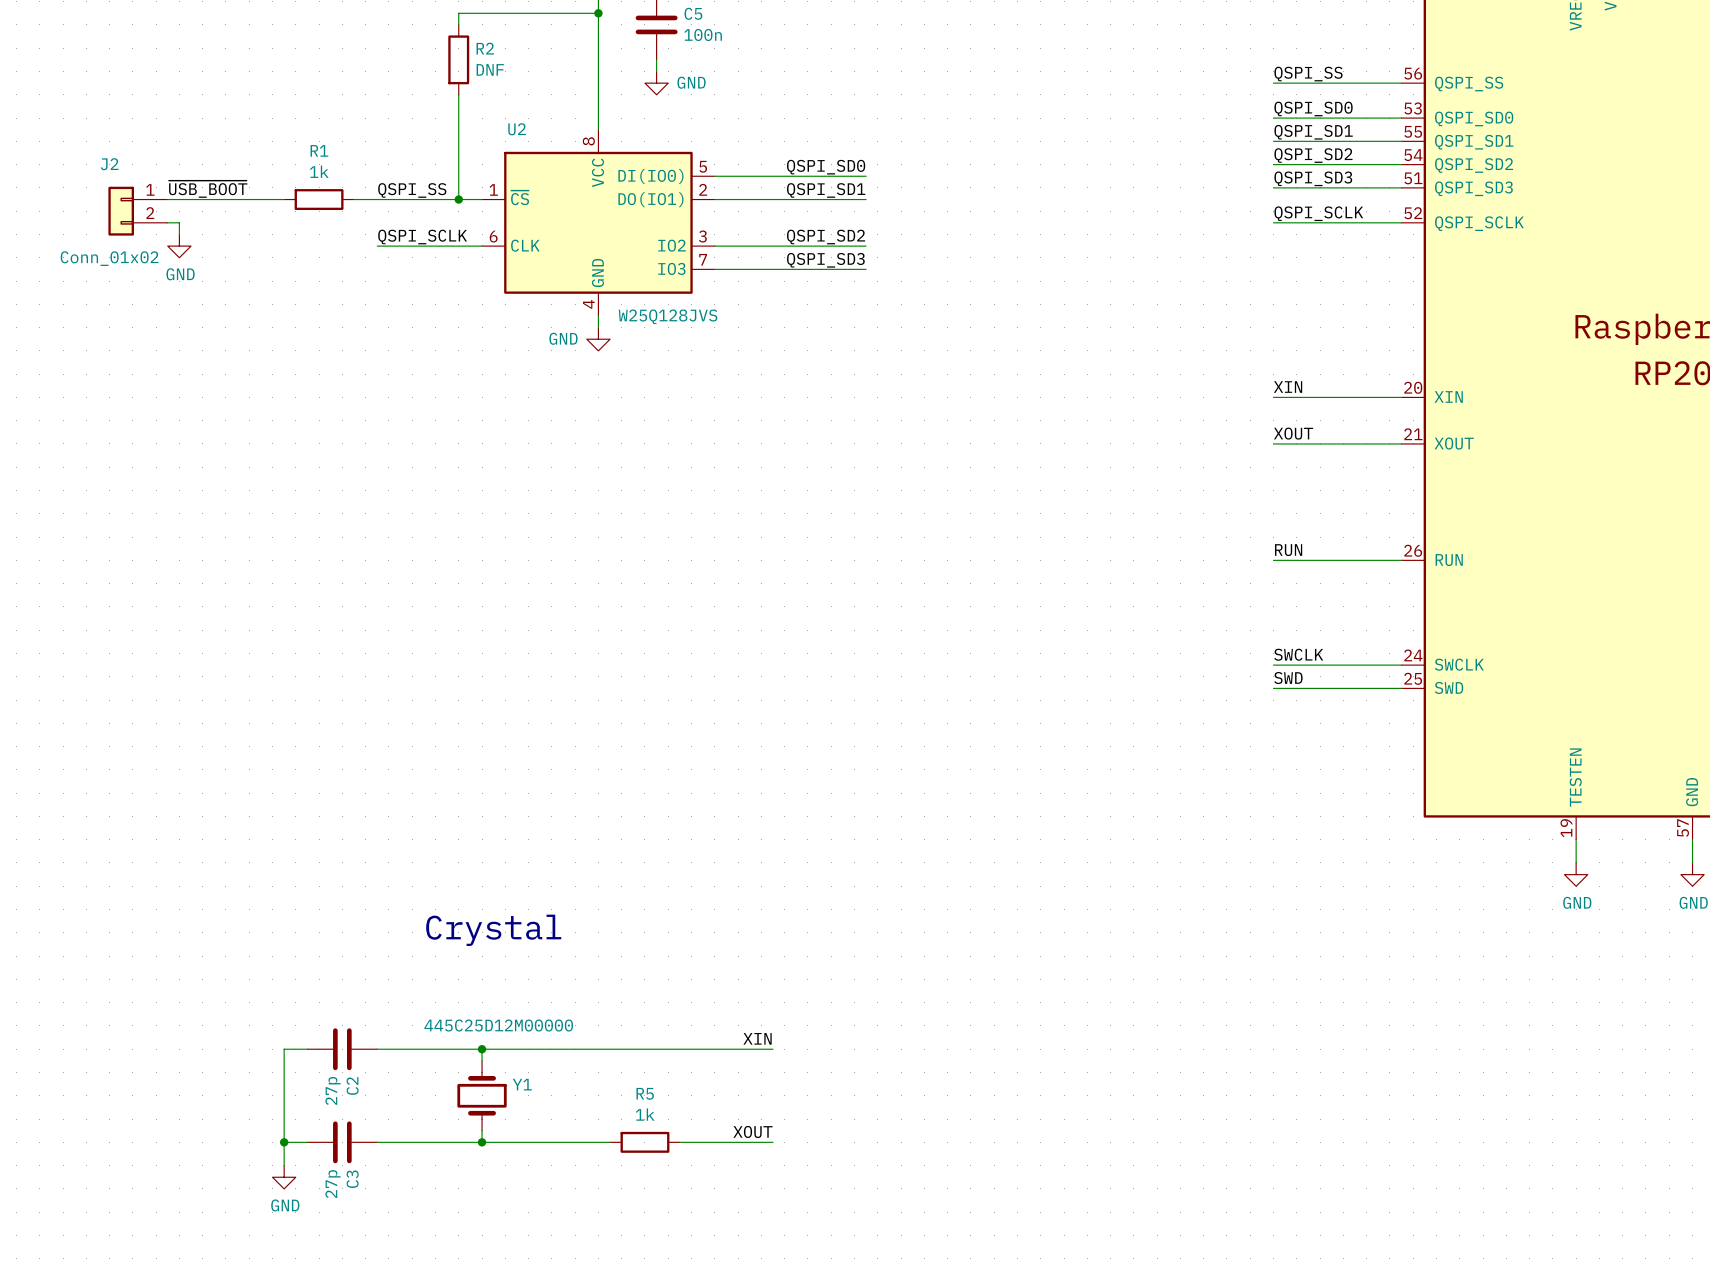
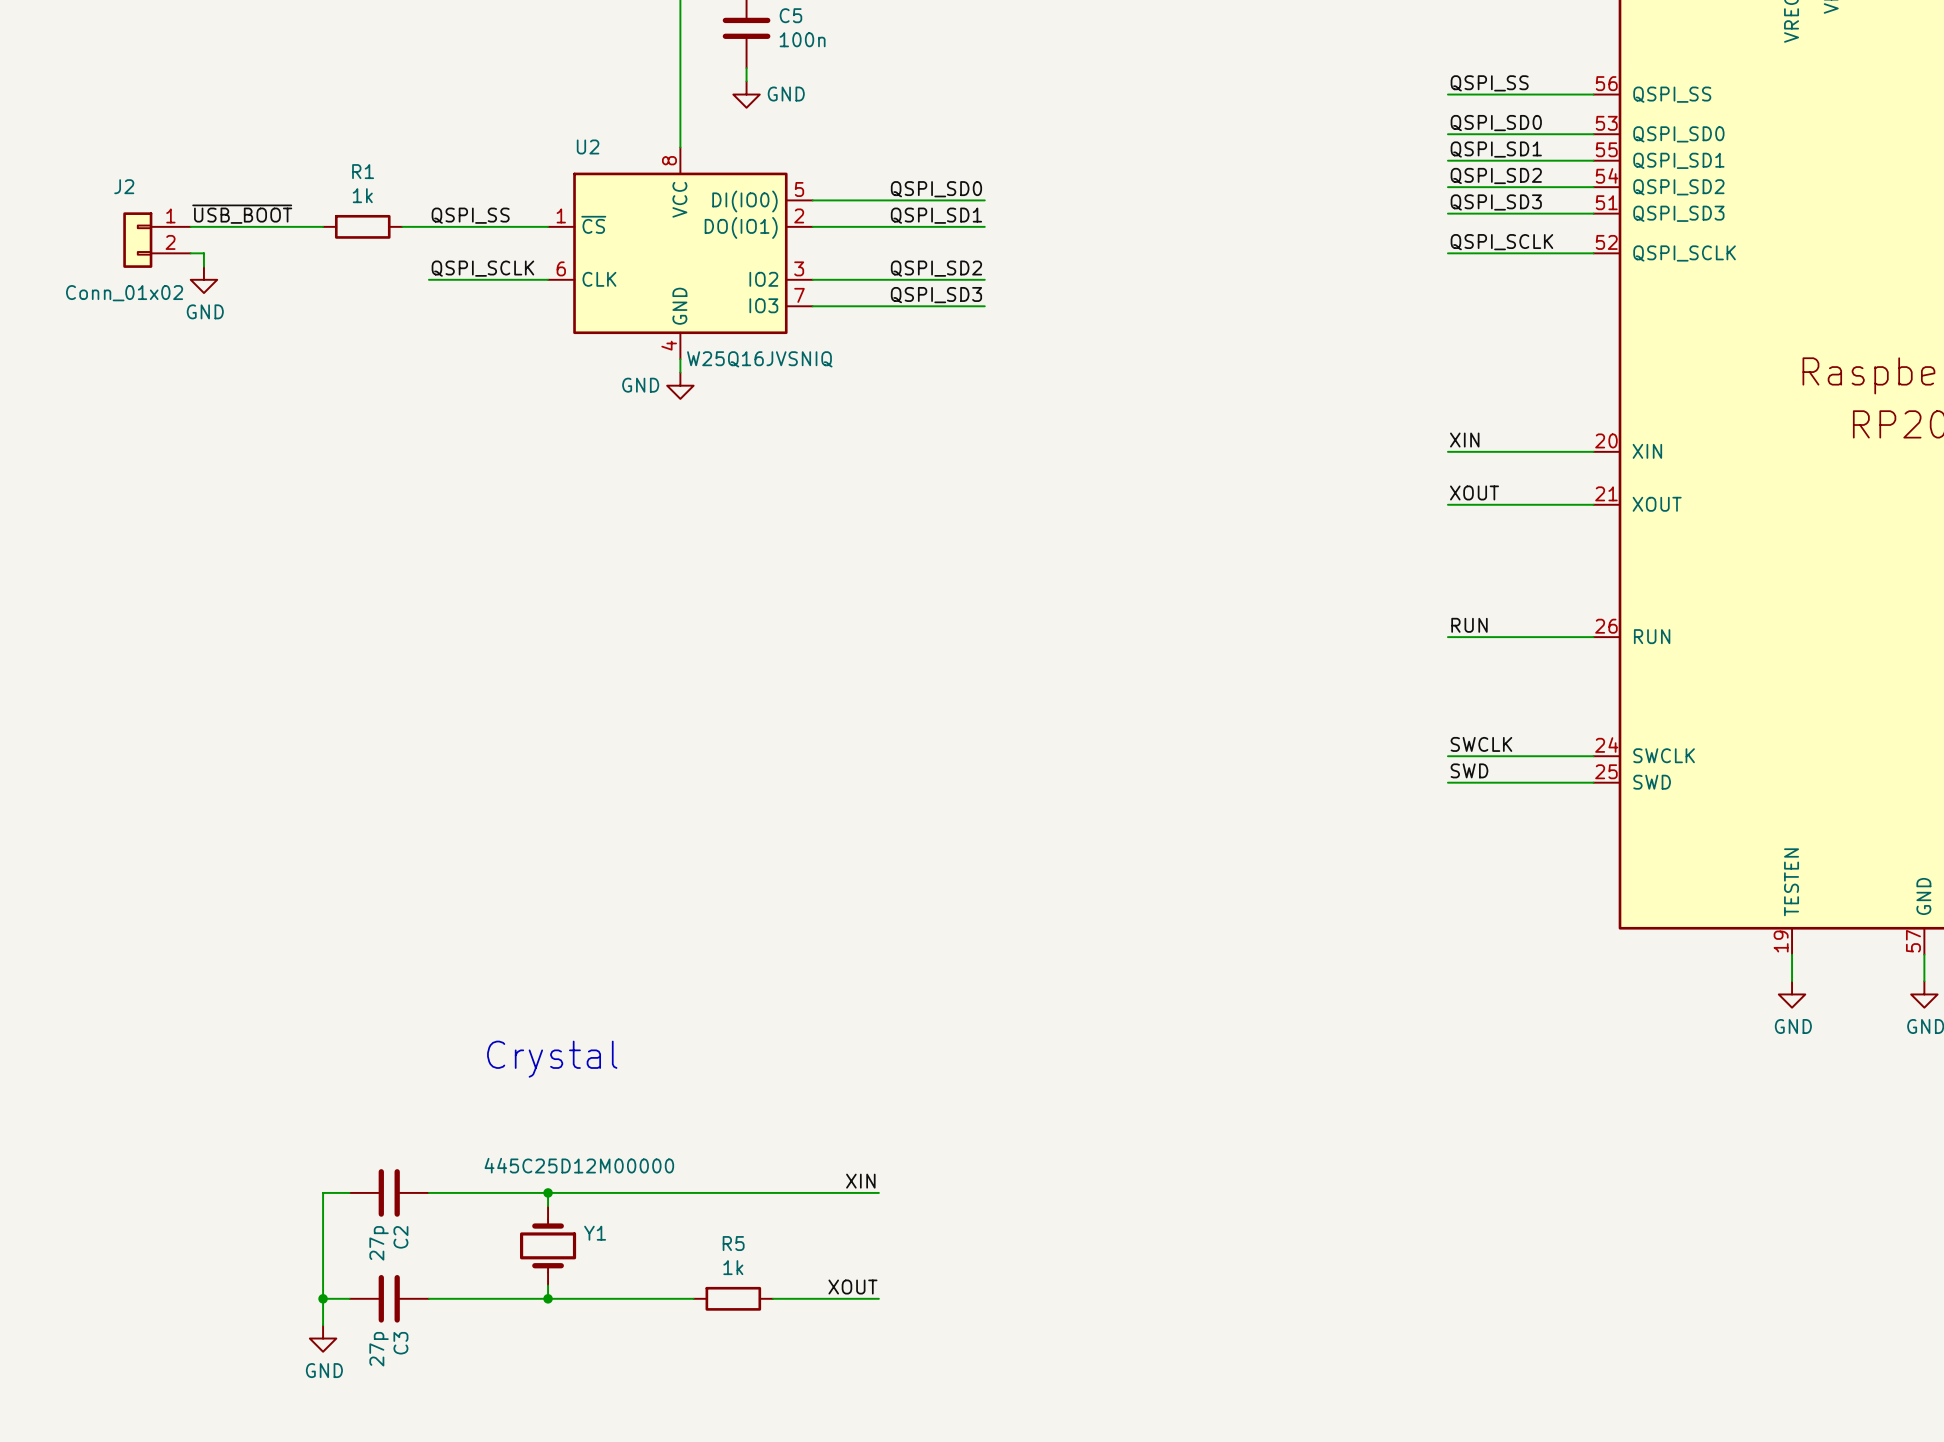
wire: (598, 13) (458, 13) (458, 24) -> none
junction: (598, 13) -> none
R2: DNF (458, 59) -> none
wire: (458, 94) (458, 199) -> none
junction: (458, 199) -> none
U2 value: W25Q128JVS (668, 316) -> W25Q16JVSNIQ (759, 359)

